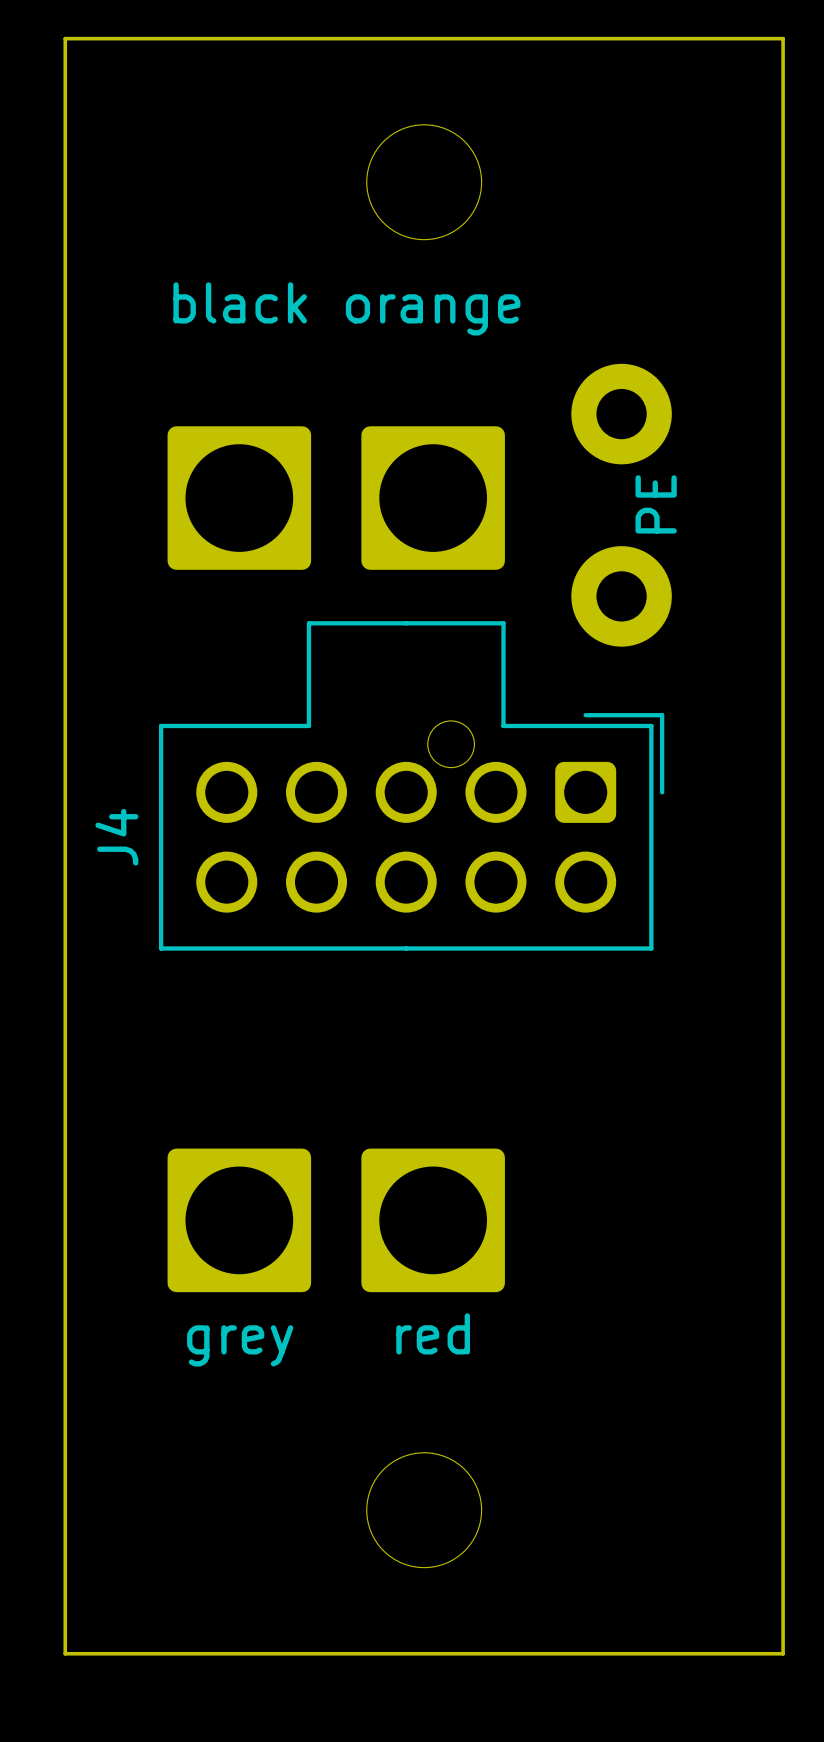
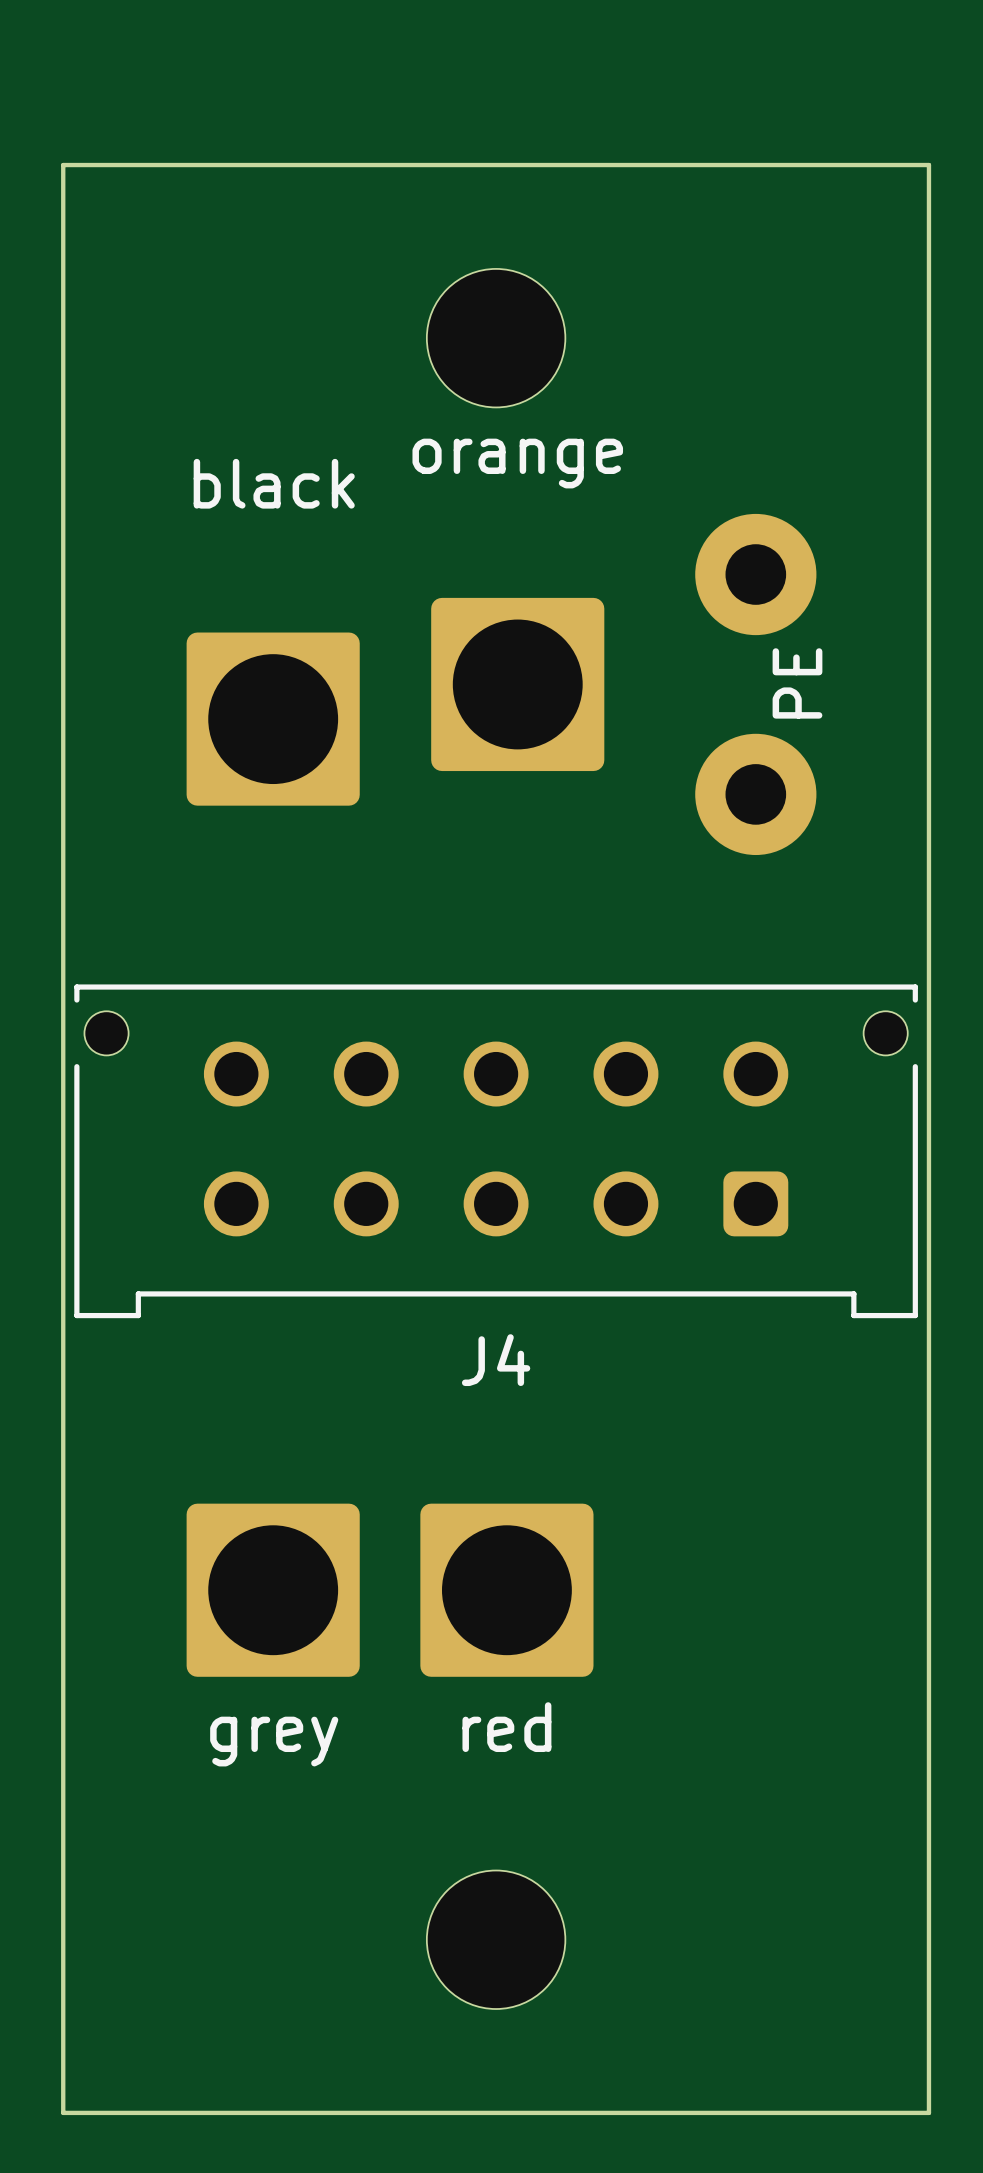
part position: (433, 498) -> (517, 684)
part position: (621, 505) -> (755, 684)
J4 footprint: [158, 621, 665, 951] -> [74, 984, 918, 1319]
J4 name position: J4 (116, 837) -> J4 (496, 1360)

